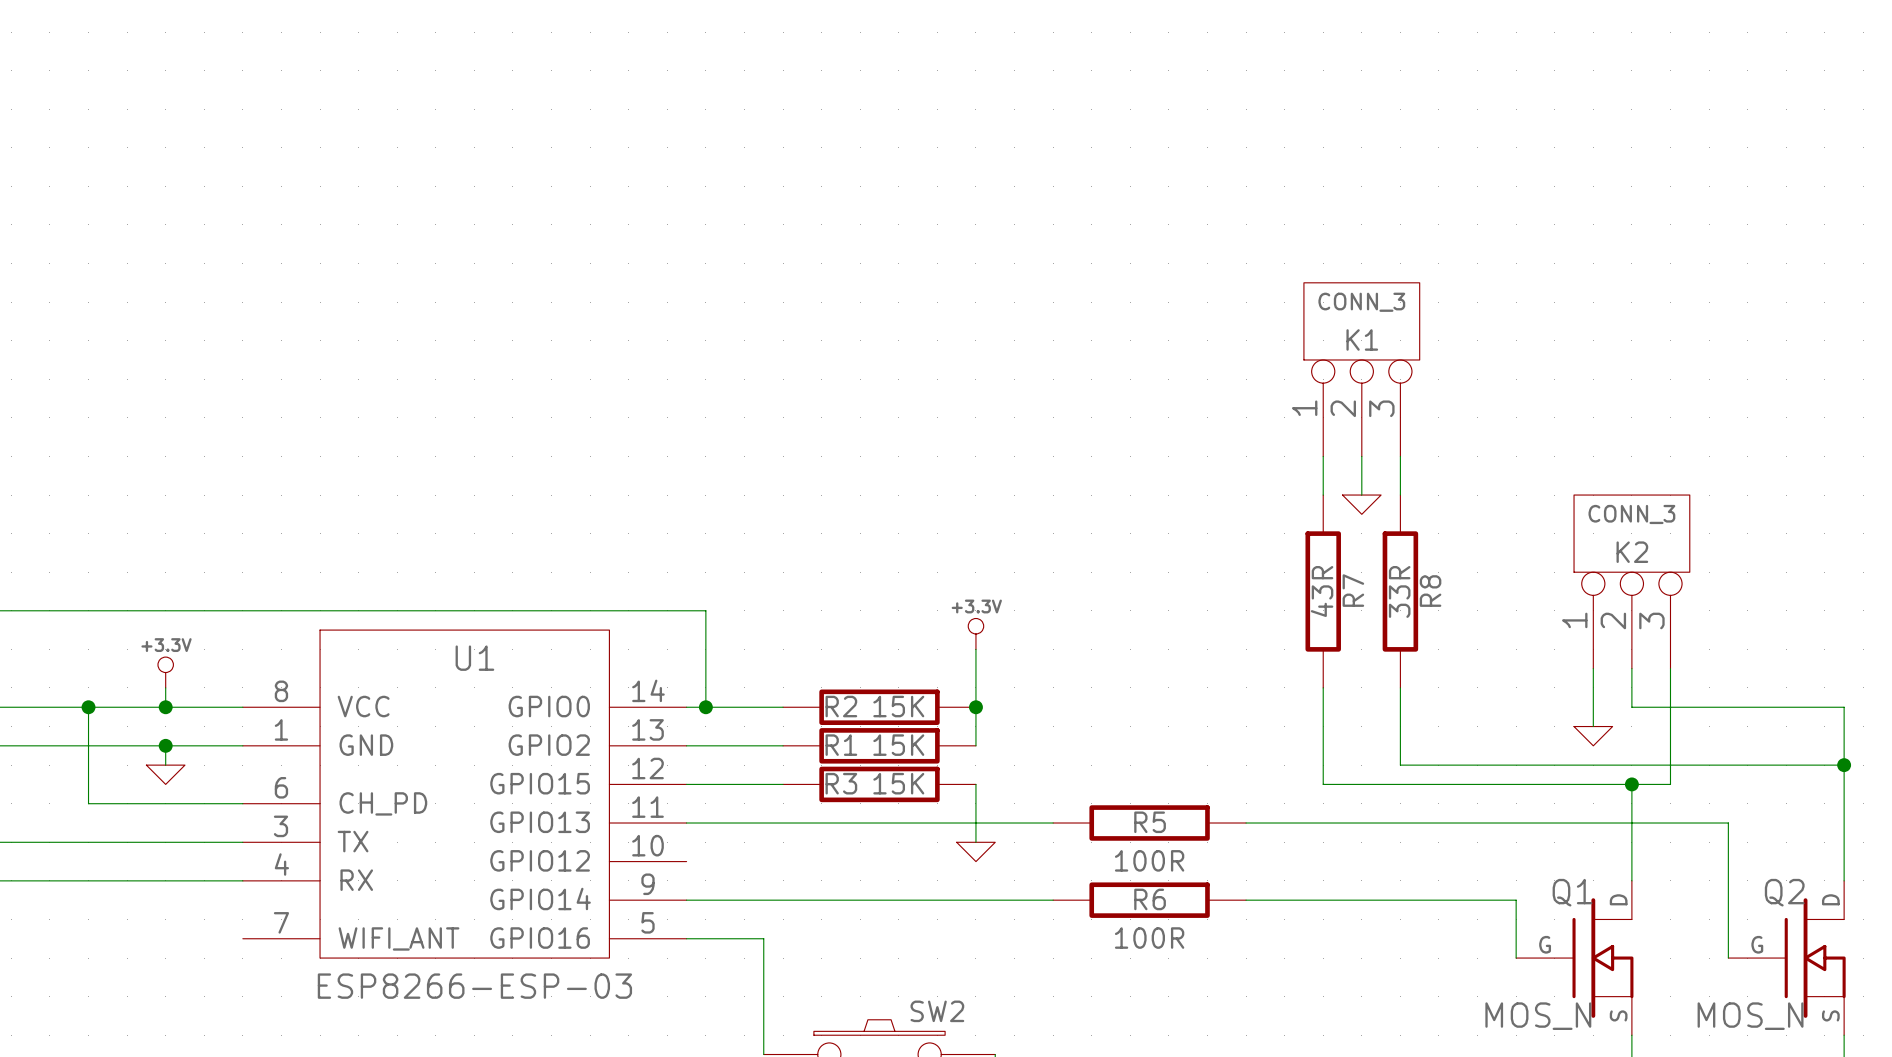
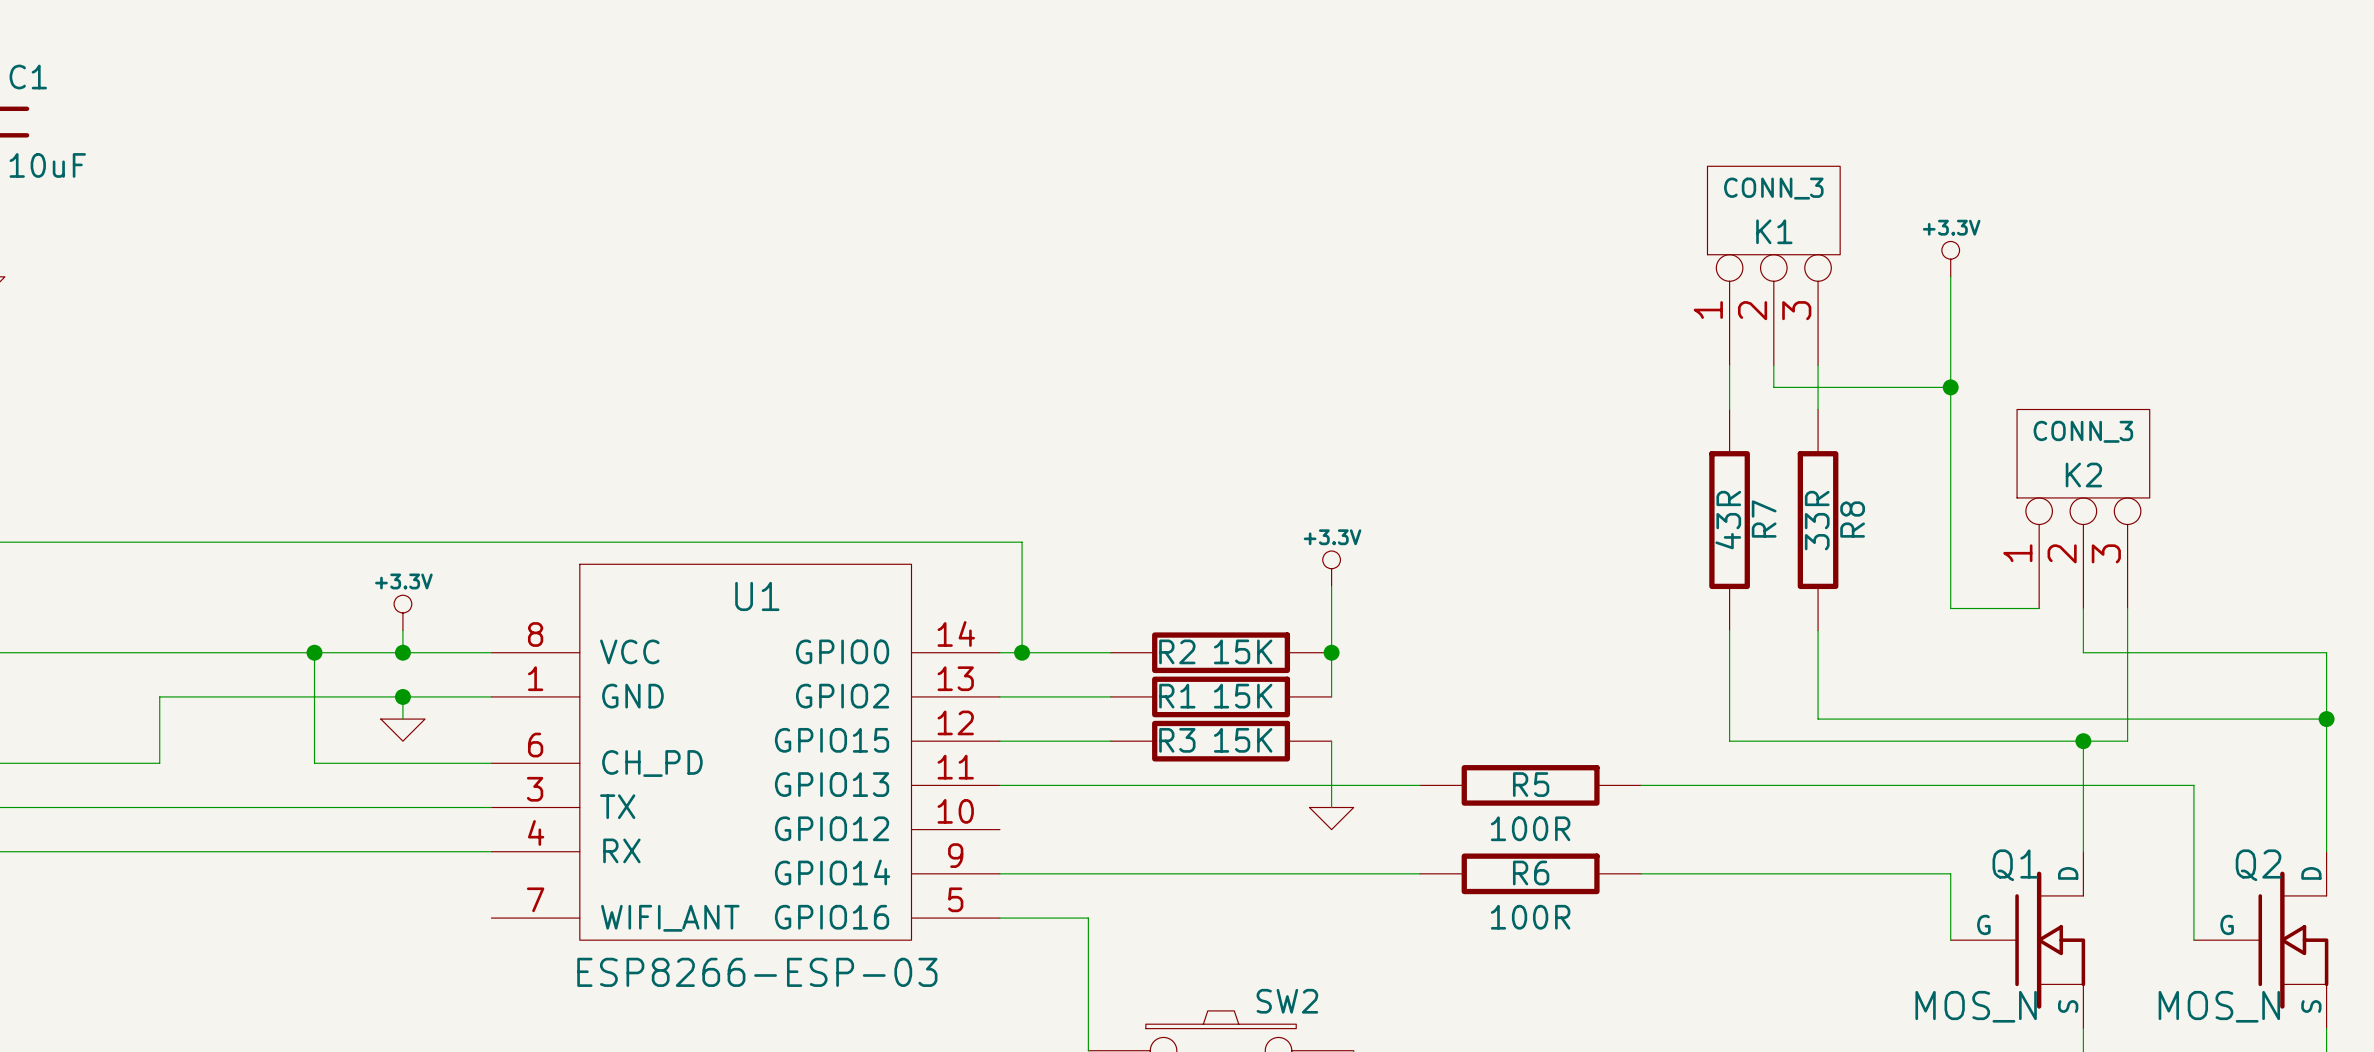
power symbol: none -> +3.3V (1950, 259)
wire: (1361, 475) (1361, 495) -> (1773, 387) (1950, 387)
junction: none -> (1950, 387)
power symbol: (1361, 504) -> none
wire: (1593, 668) (1593, 726) -> (2039, 608) (1950, 608) (1950, 276)
power symbol: (1593, 736) -> none

